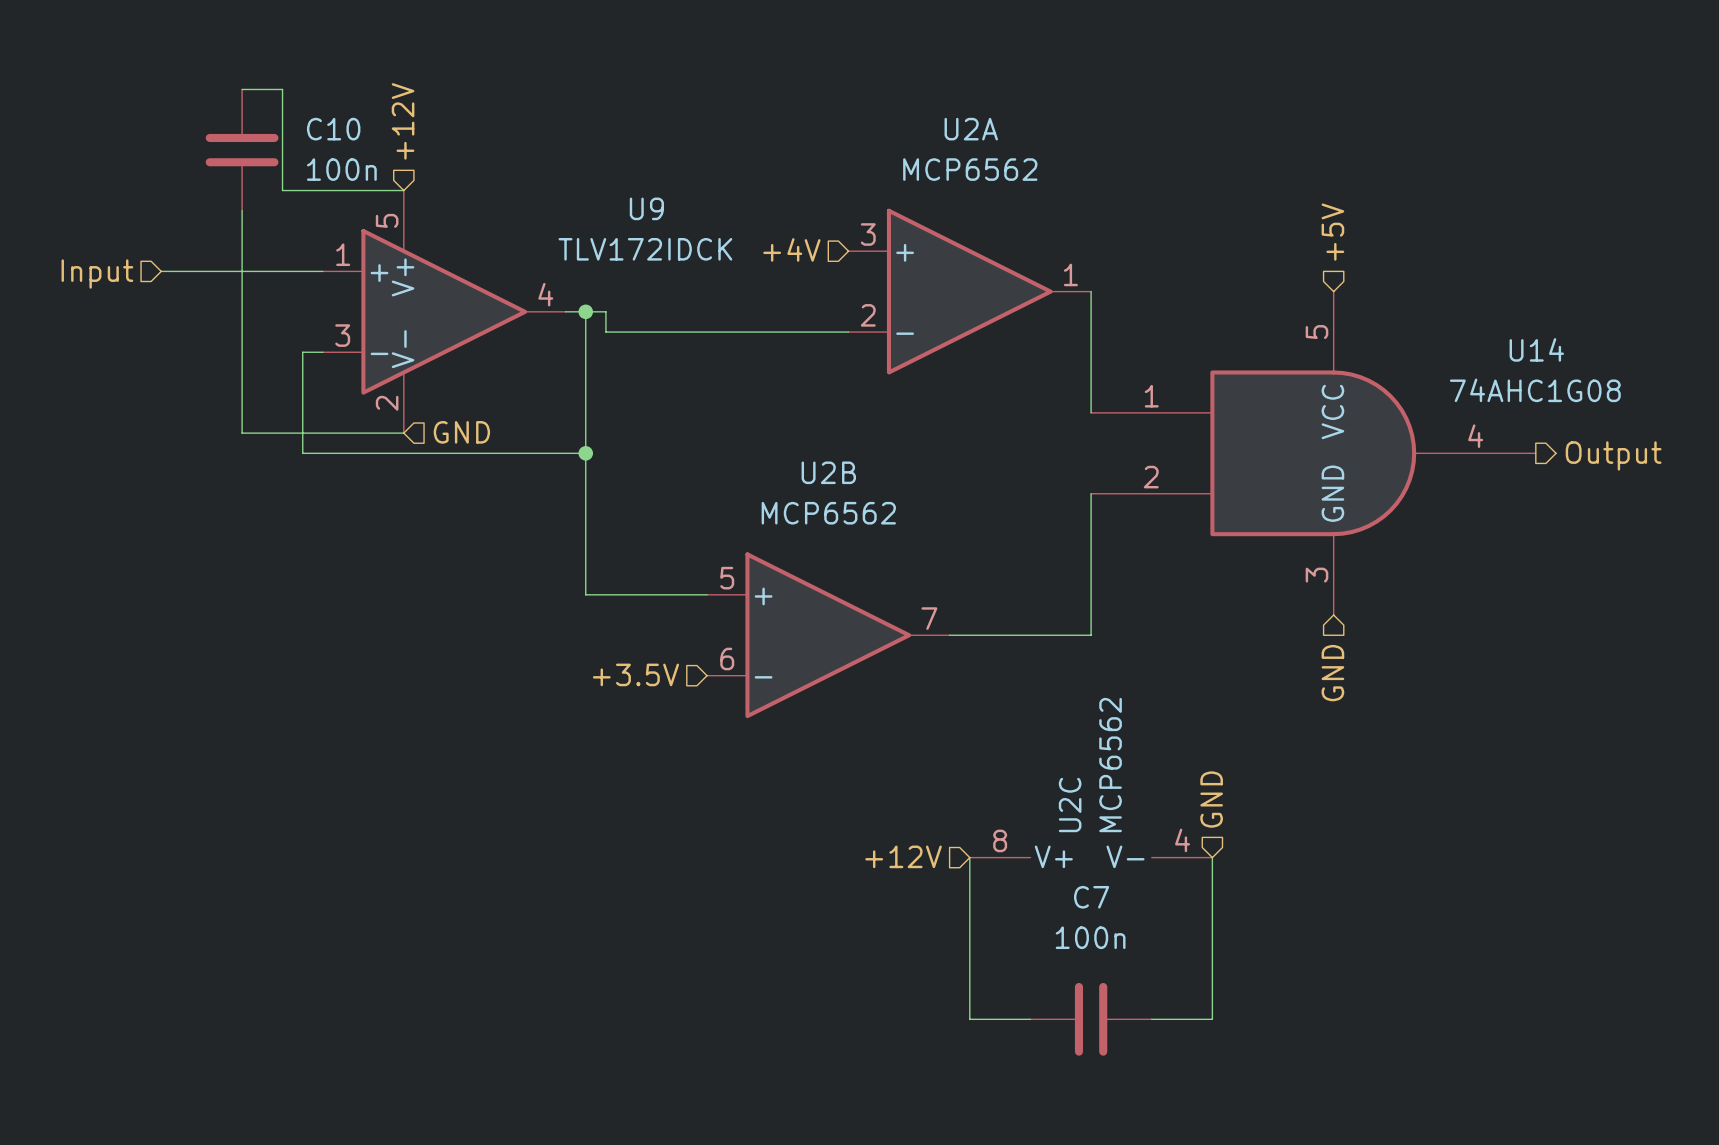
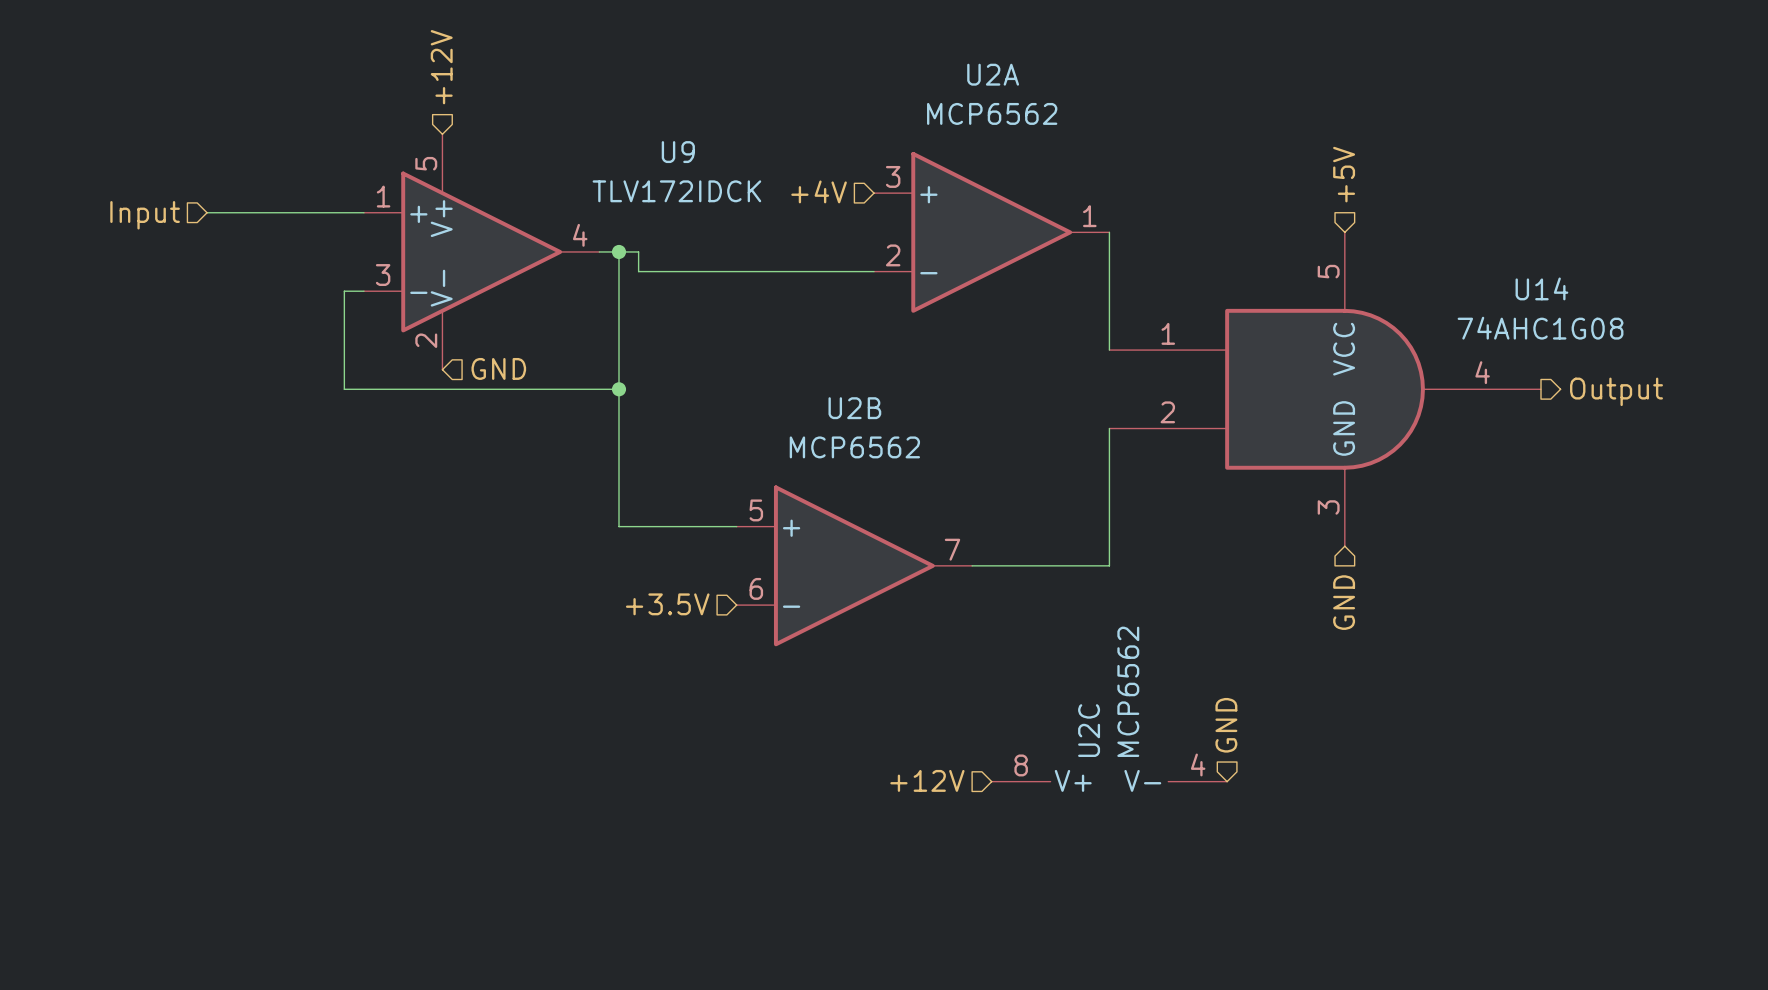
wire: (242, 89) (282, 89) (282, 190) (403, 190) -> none
C10: 100n (242, 150) -> none
wire: (242, 210) (242, 433) (403, 433) -> none
wire: (969, 857) (969, 1019) (1030, 1019) -> none
wire: (1212, 857) (1212, 1019) (1151, 1019) -> none
C7: 100n (1091, 1019) -> none

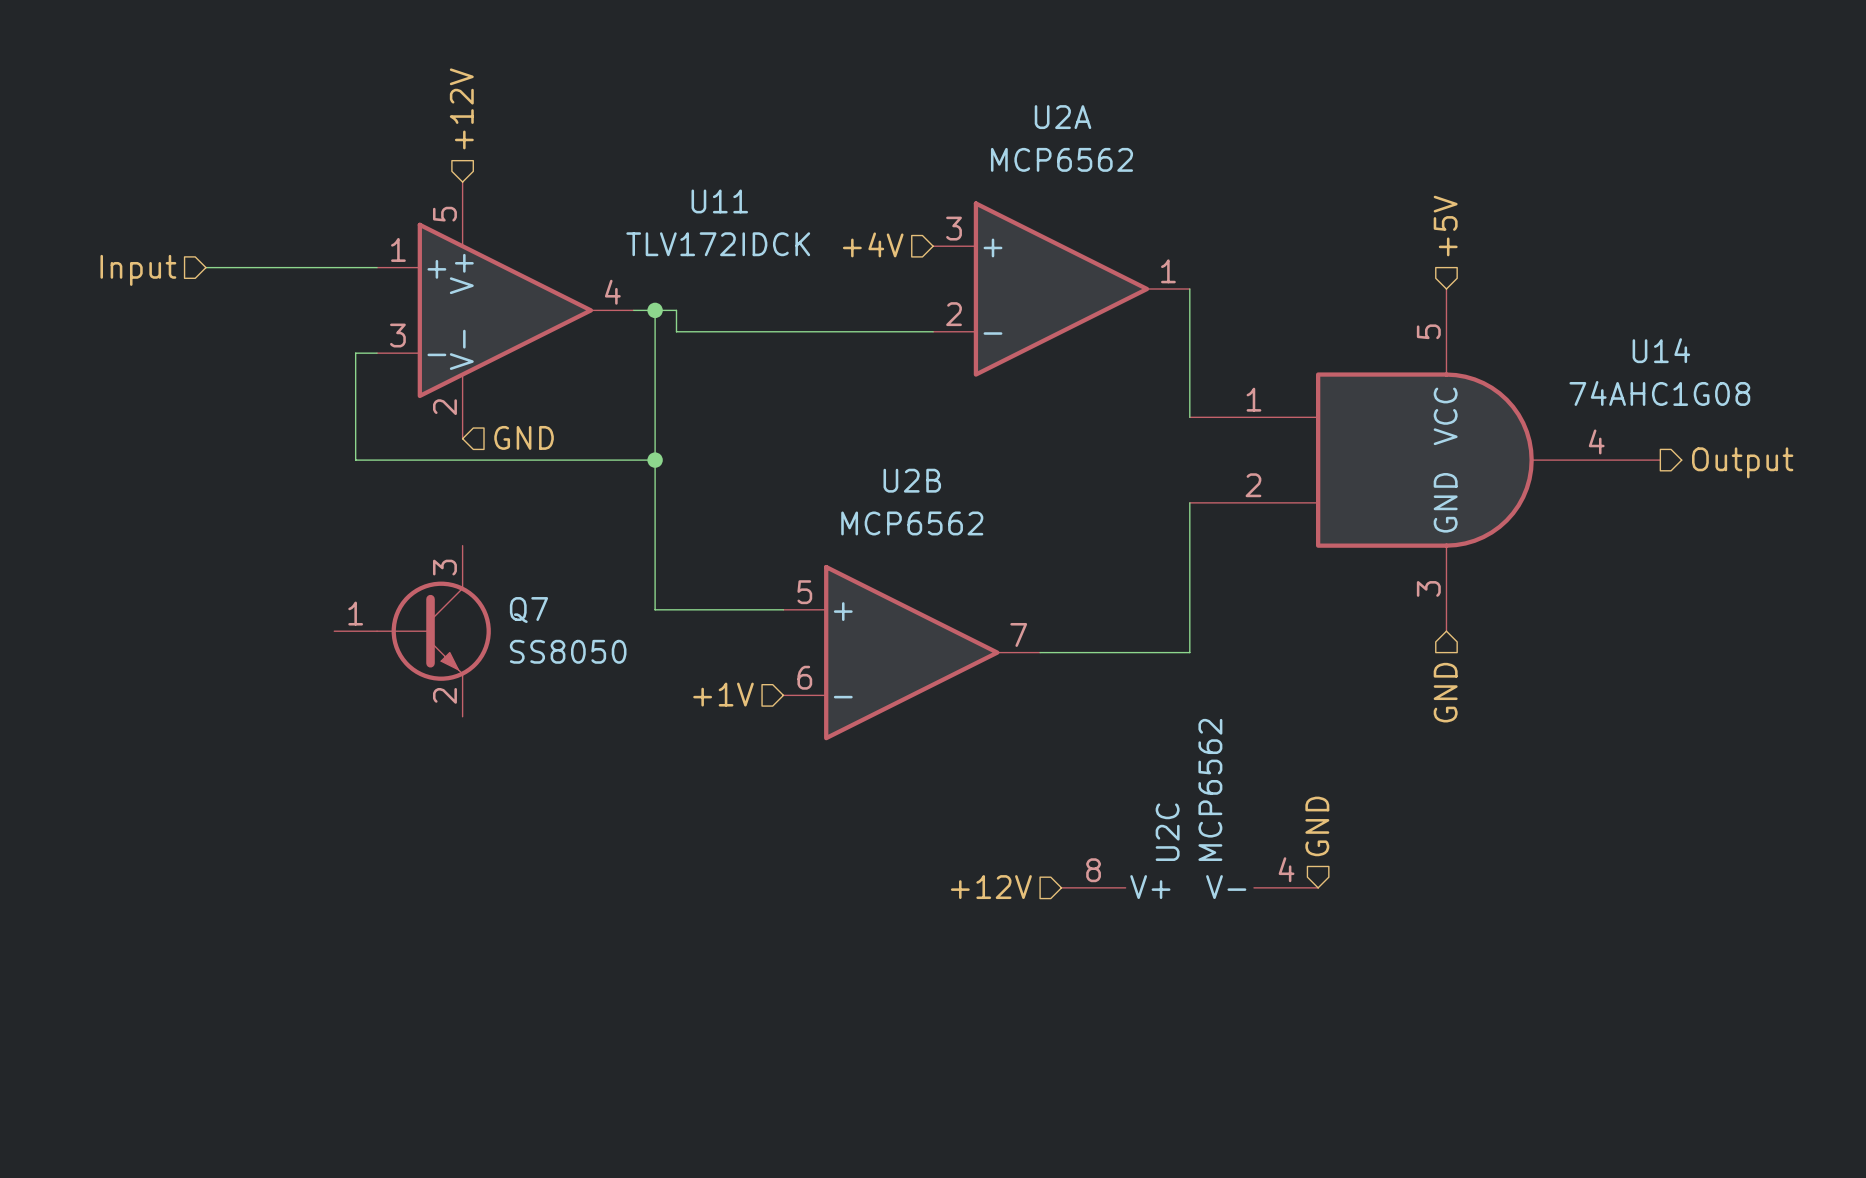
U9 name: U9 (678, 152) -> U11 (719, 201)
Q7: none -> SS8050 (412, 631)
hierarchical label: +3.5V (667, 604) -> +1V (723, 694)

